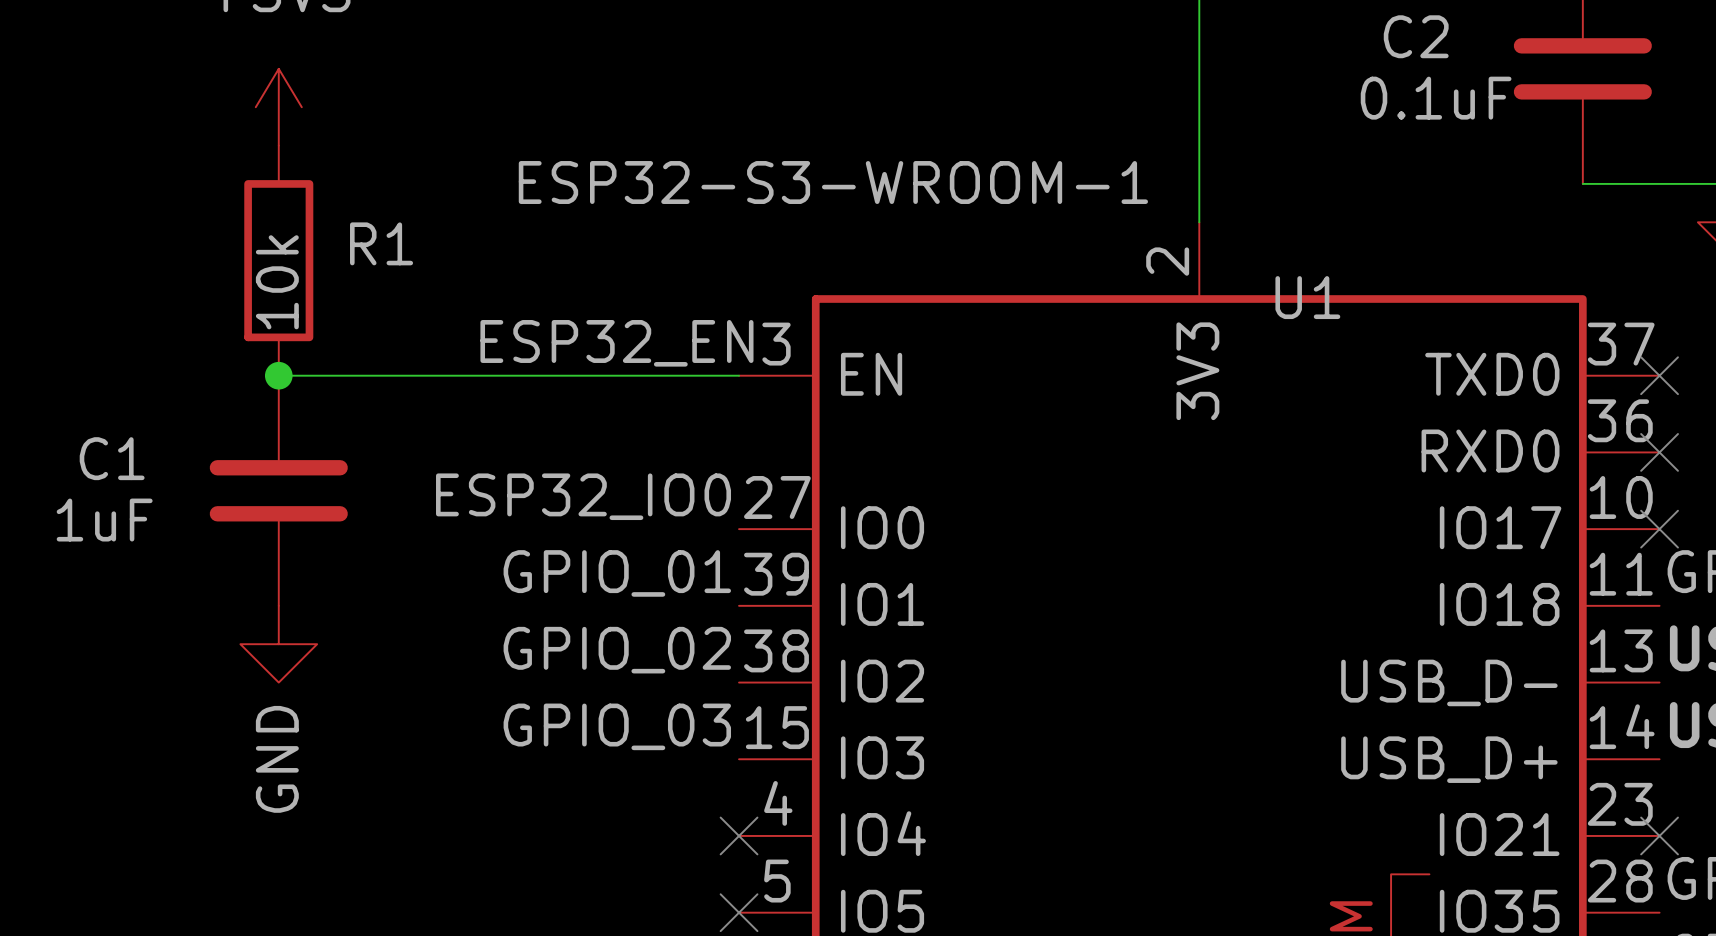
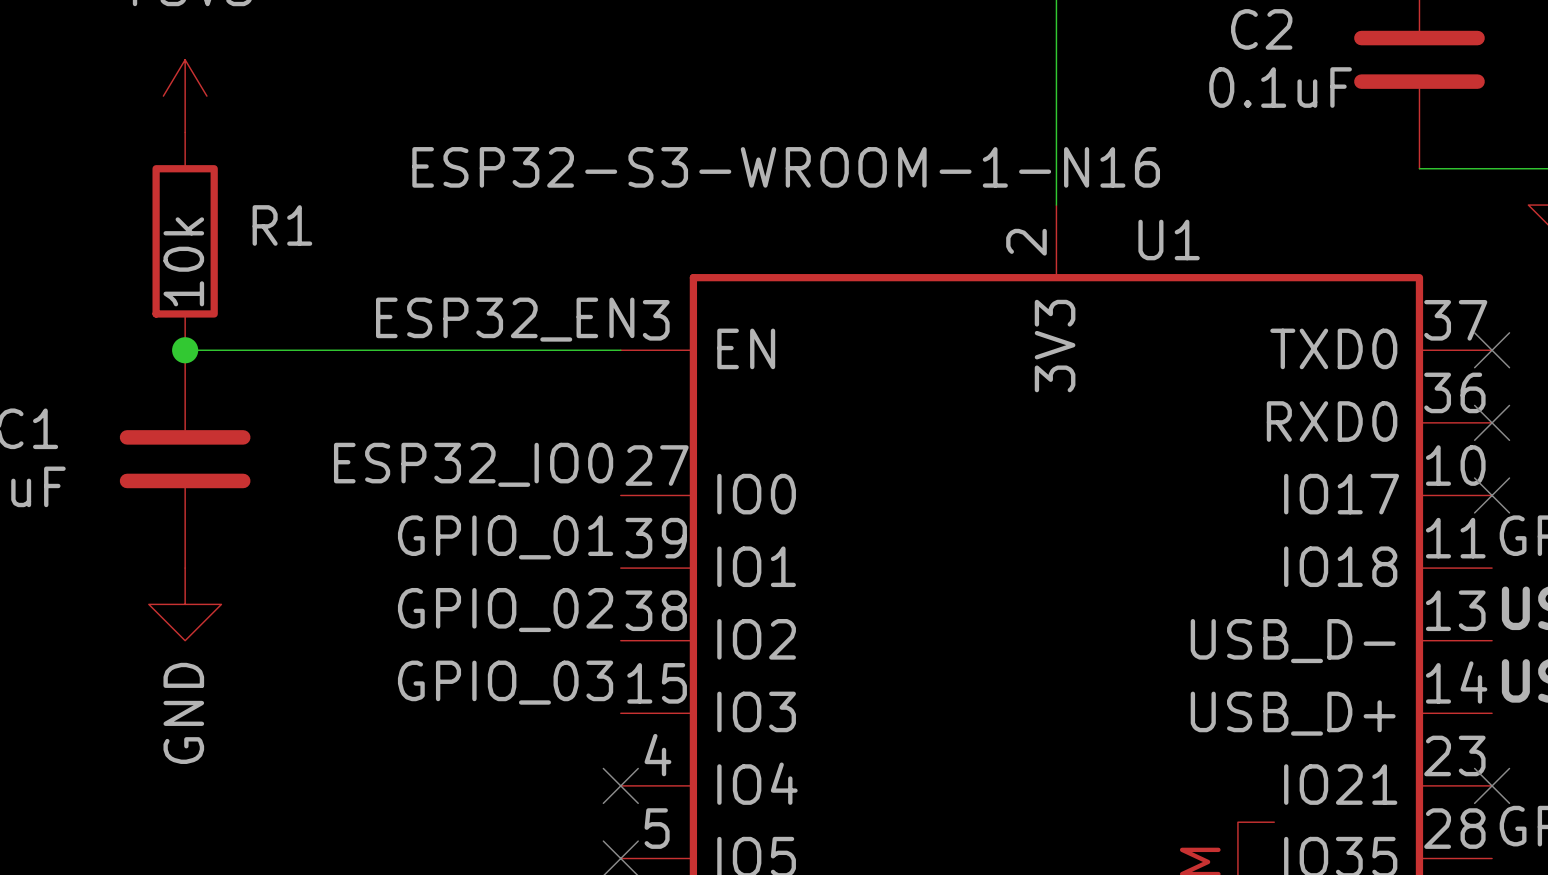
U1 value: ESP32-S3-WROOM-1 (833, 182) -> ESP32-S3-WROOM-1-N16 (786, 167)
U1 name position: U1 (1307, 297) -> U1 (1169, 239)

